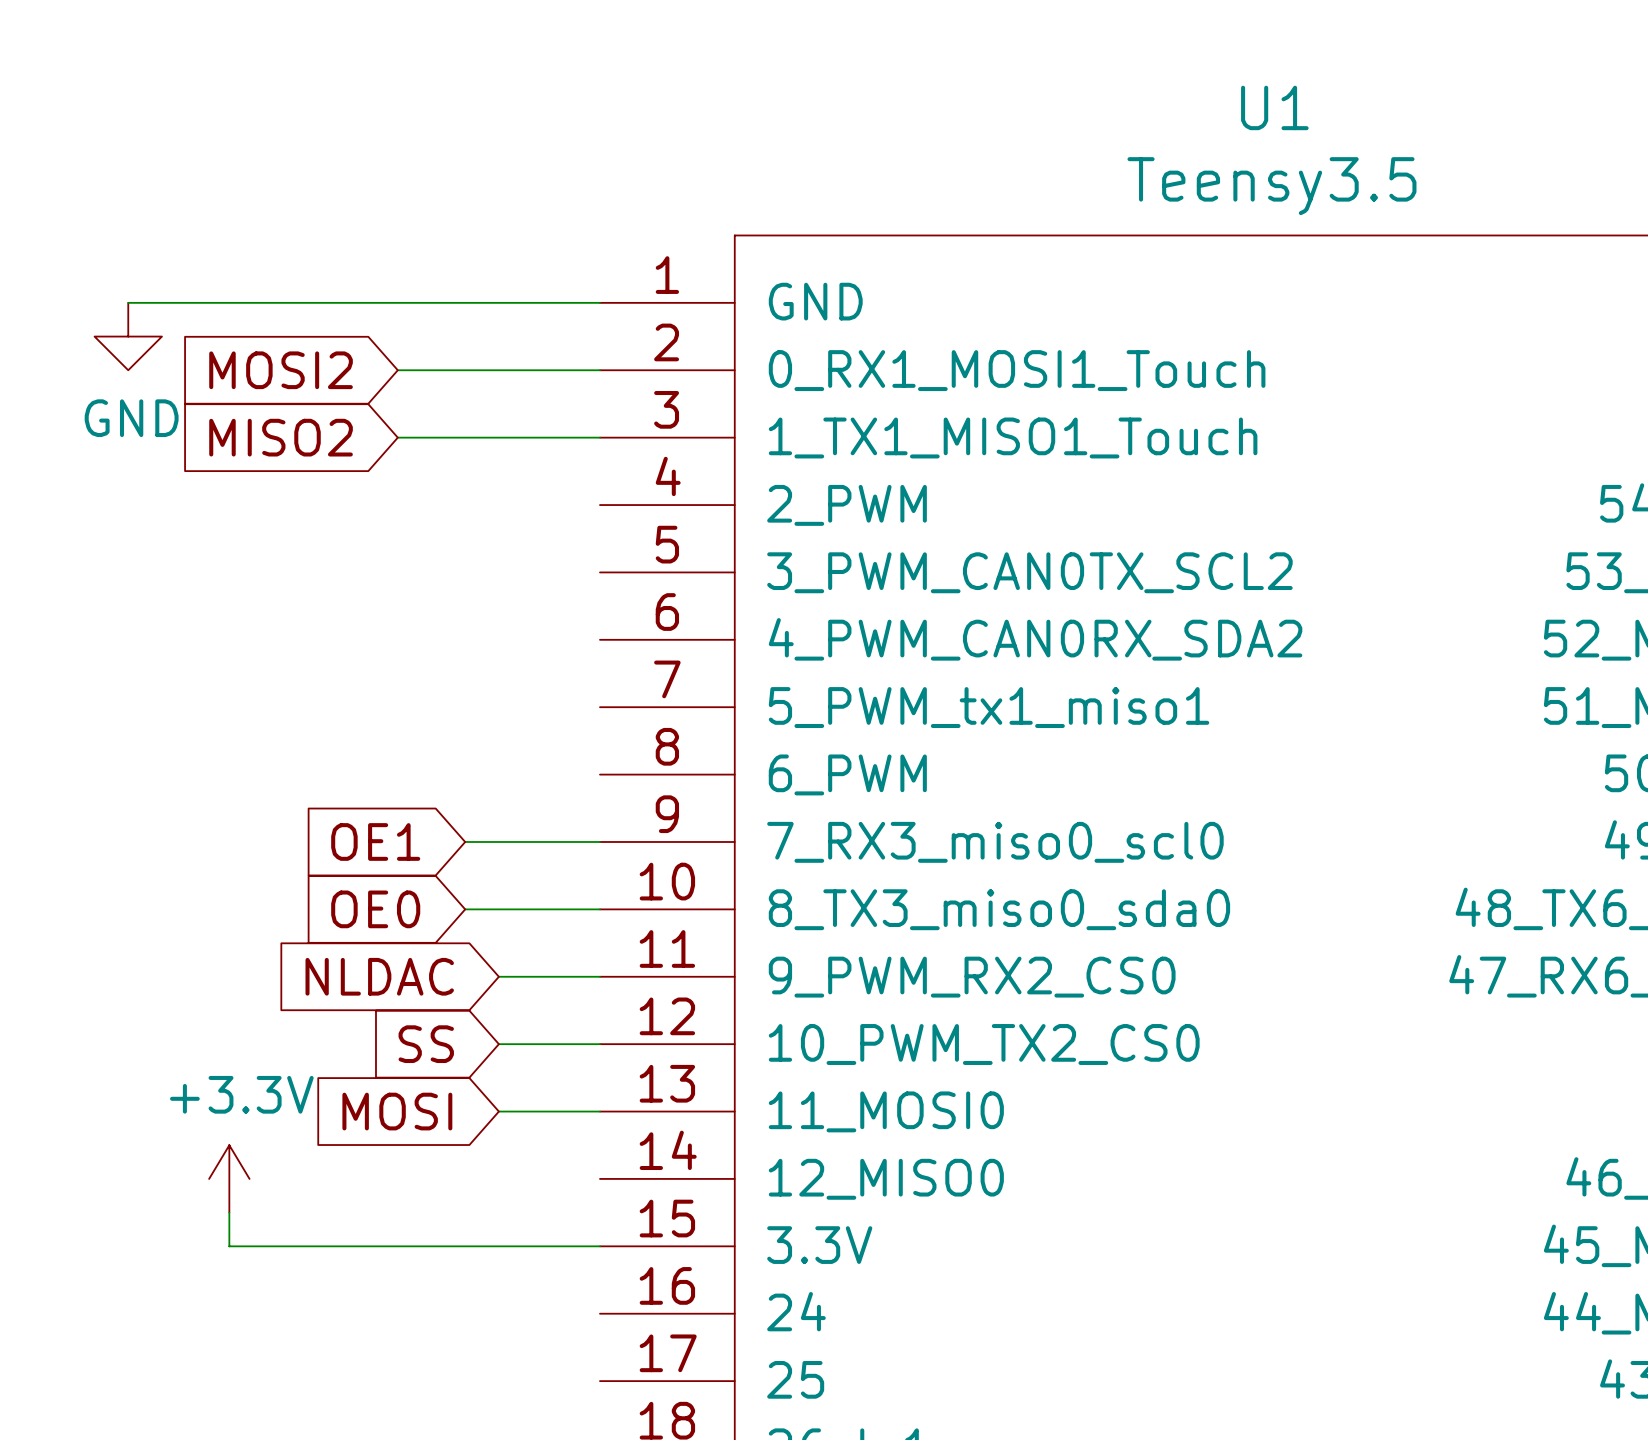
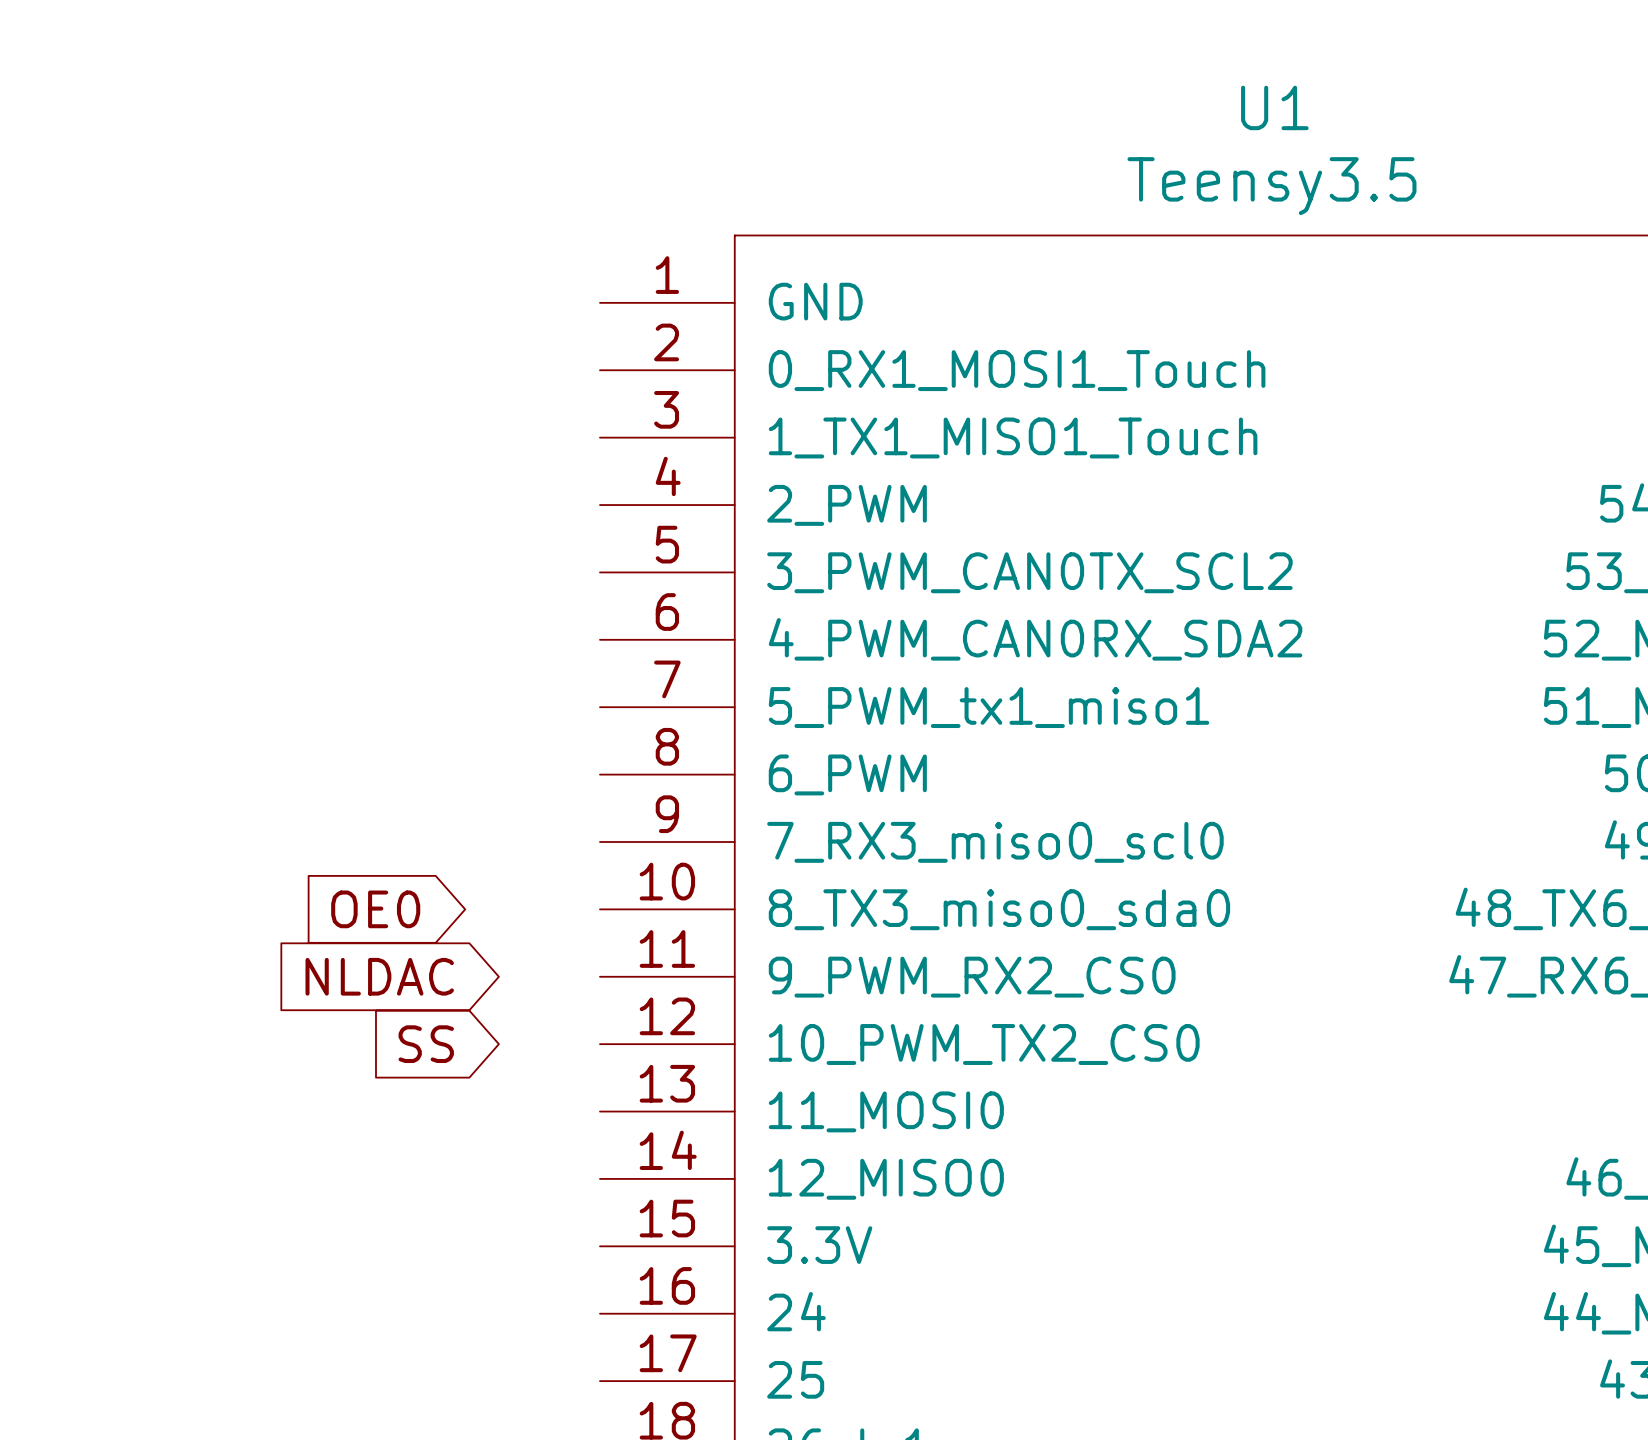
wire: (128, 302) (599, 302) -> none
power symbol: GND (128, 336) -> none
global label: MOSI2 (281, 370) -> none
wire: (397, 370) (599, 370) -> none
global label: MISO2 (281, 437) -> none
wire: (397, 437) (599, 437) -> none
global label: OE1 (375, 841) -> none
wire: (465, 841) (599, 841) -> none
wire: (465, 909) (599, 909) -> none
wire: (498, 976) (599, 976) -> none
wire: (498, 1044) (599, 1044) -> none
global label: MOSI (397, 1111) -> none
wire: (498, 1111) (599, 1111) -> none
power symbol: +3.3V (229, 1178) -> none
wire: (229, 1212) (229, 1246) (599, 1246) -> none

